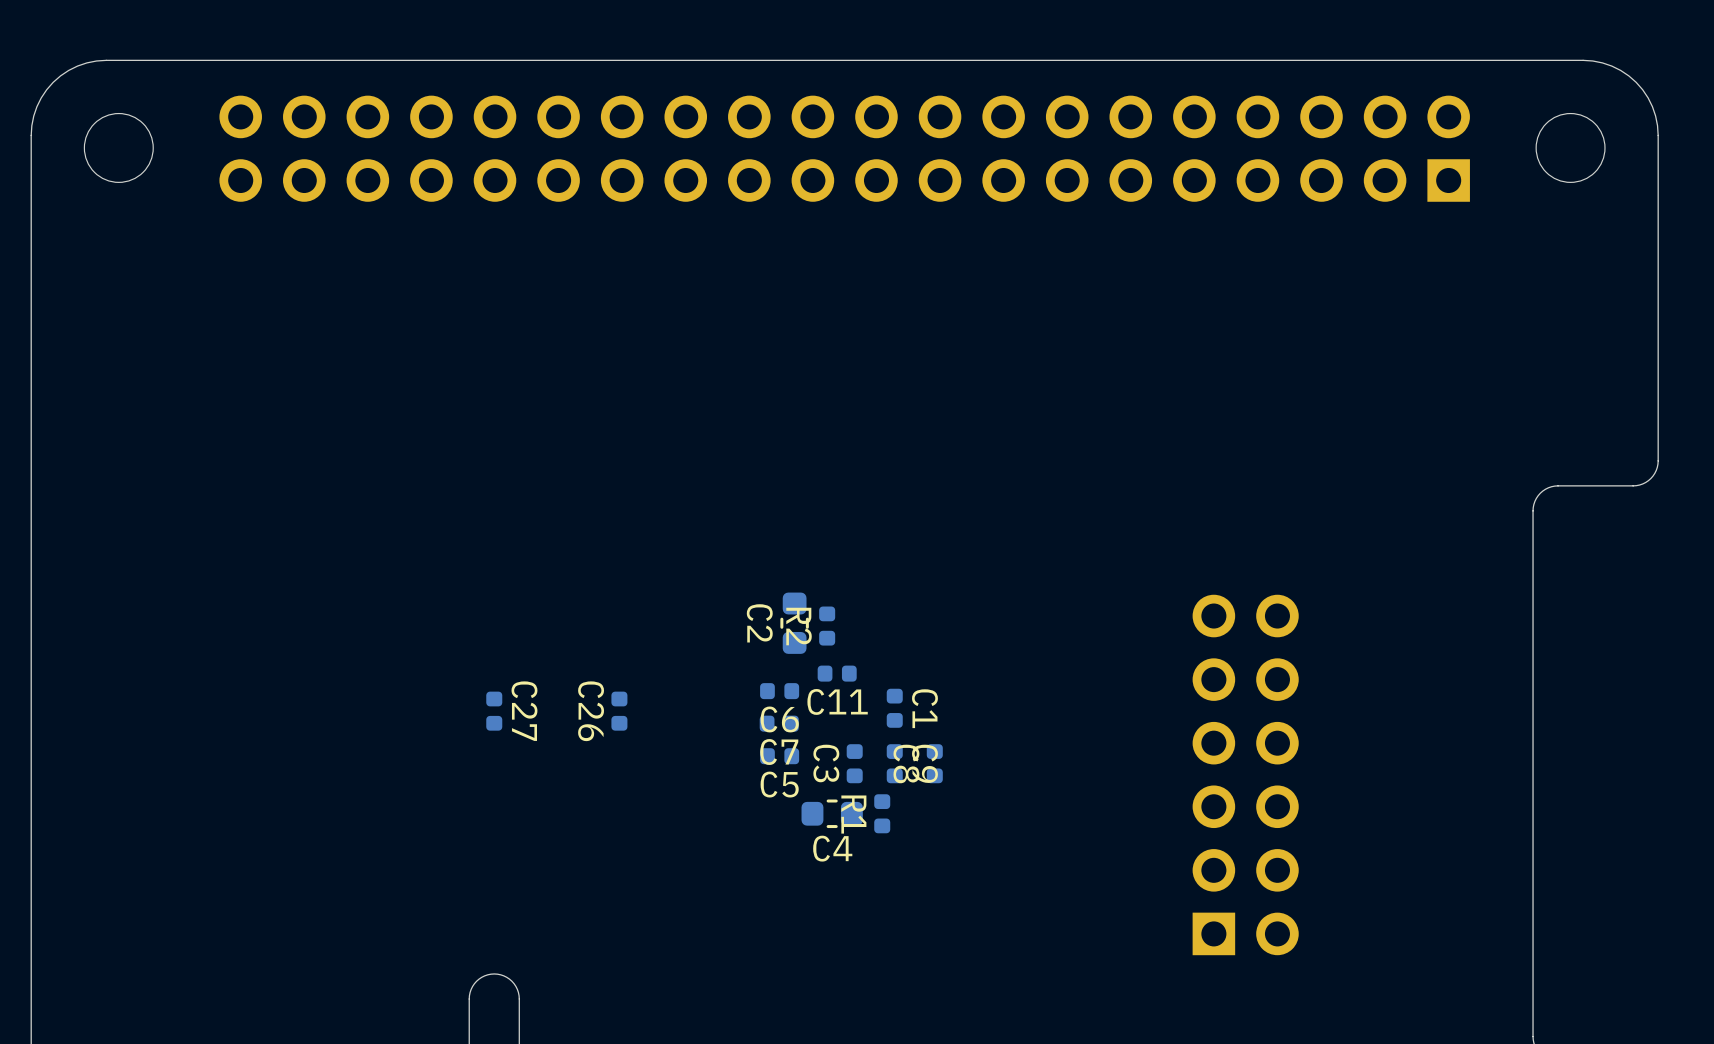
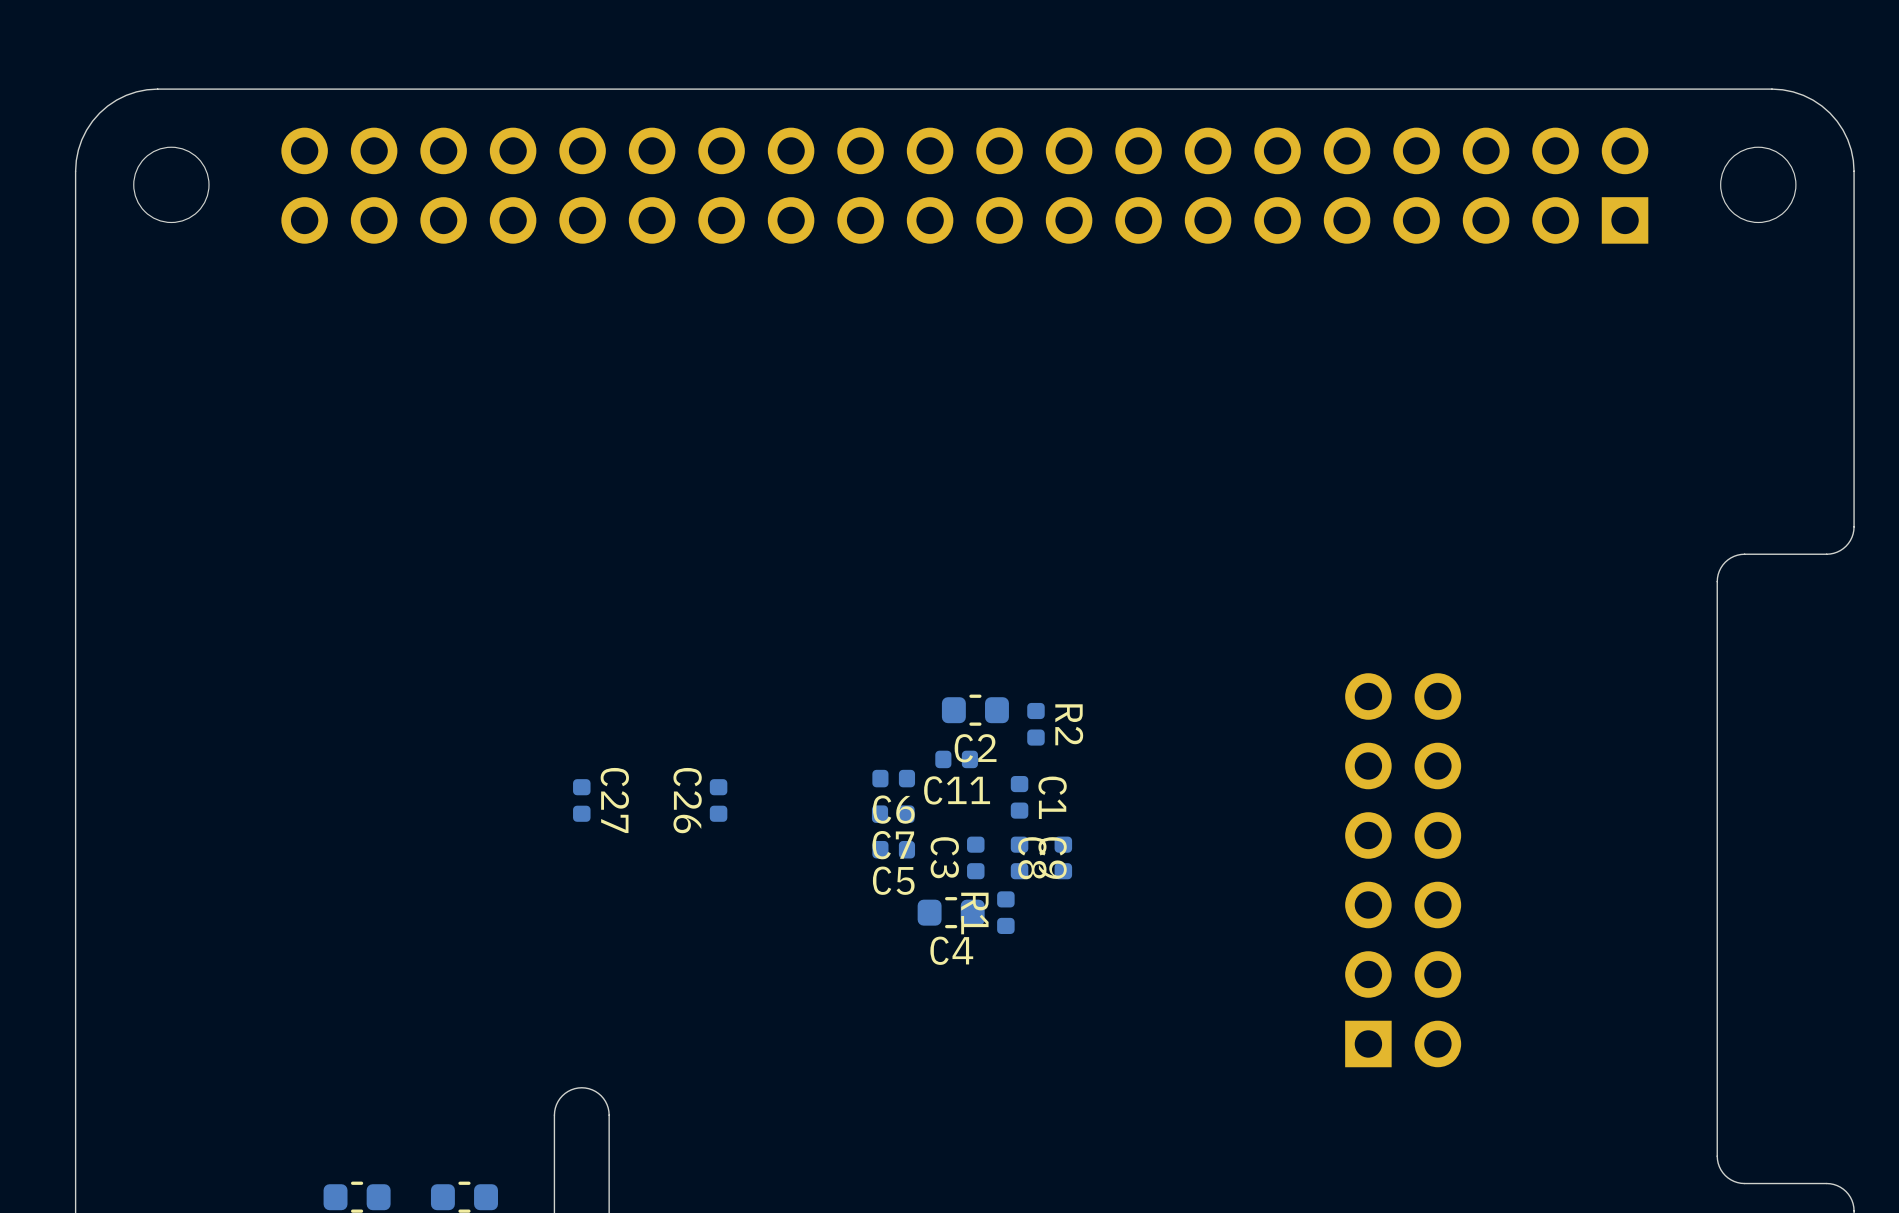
C2 name position: C2 (759, 623) -> C2 (975, 748)
C2 rotation: 0° (794, 623) -> 90° clockwise (975, 710)
C2 position: (794, 623) -> (975, 710)
R2 name position: R2 (799, 626) -> R2 (1069, 724)
R2 position: (827, 626) -> (1035, 724)

